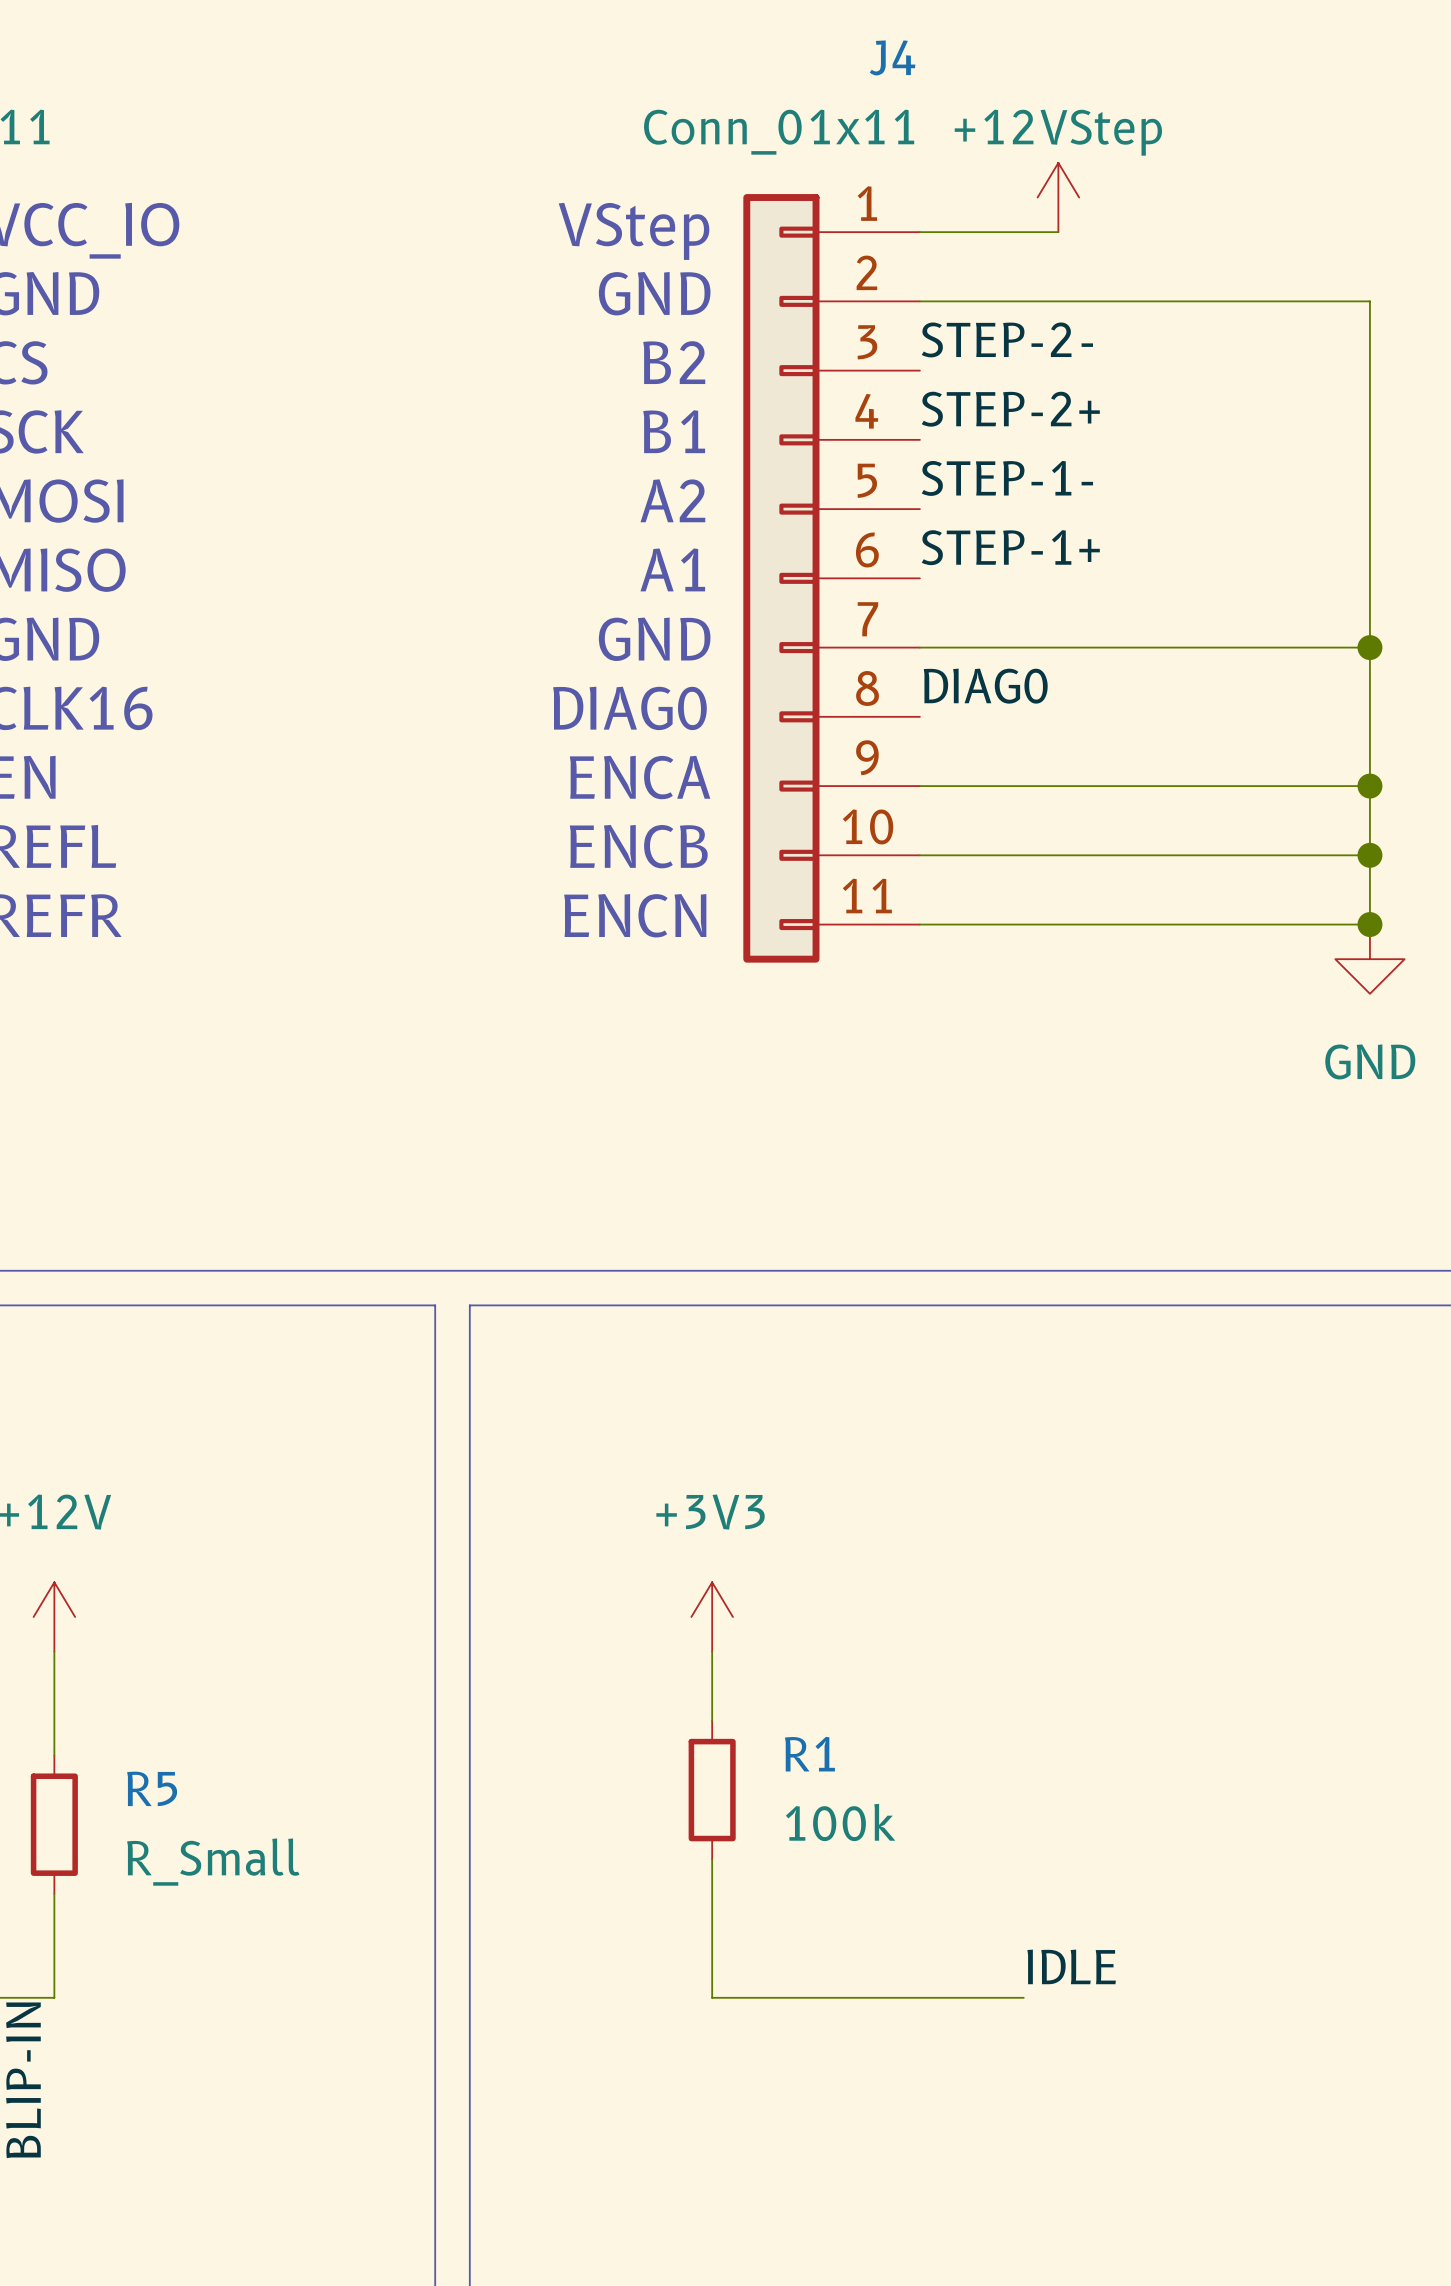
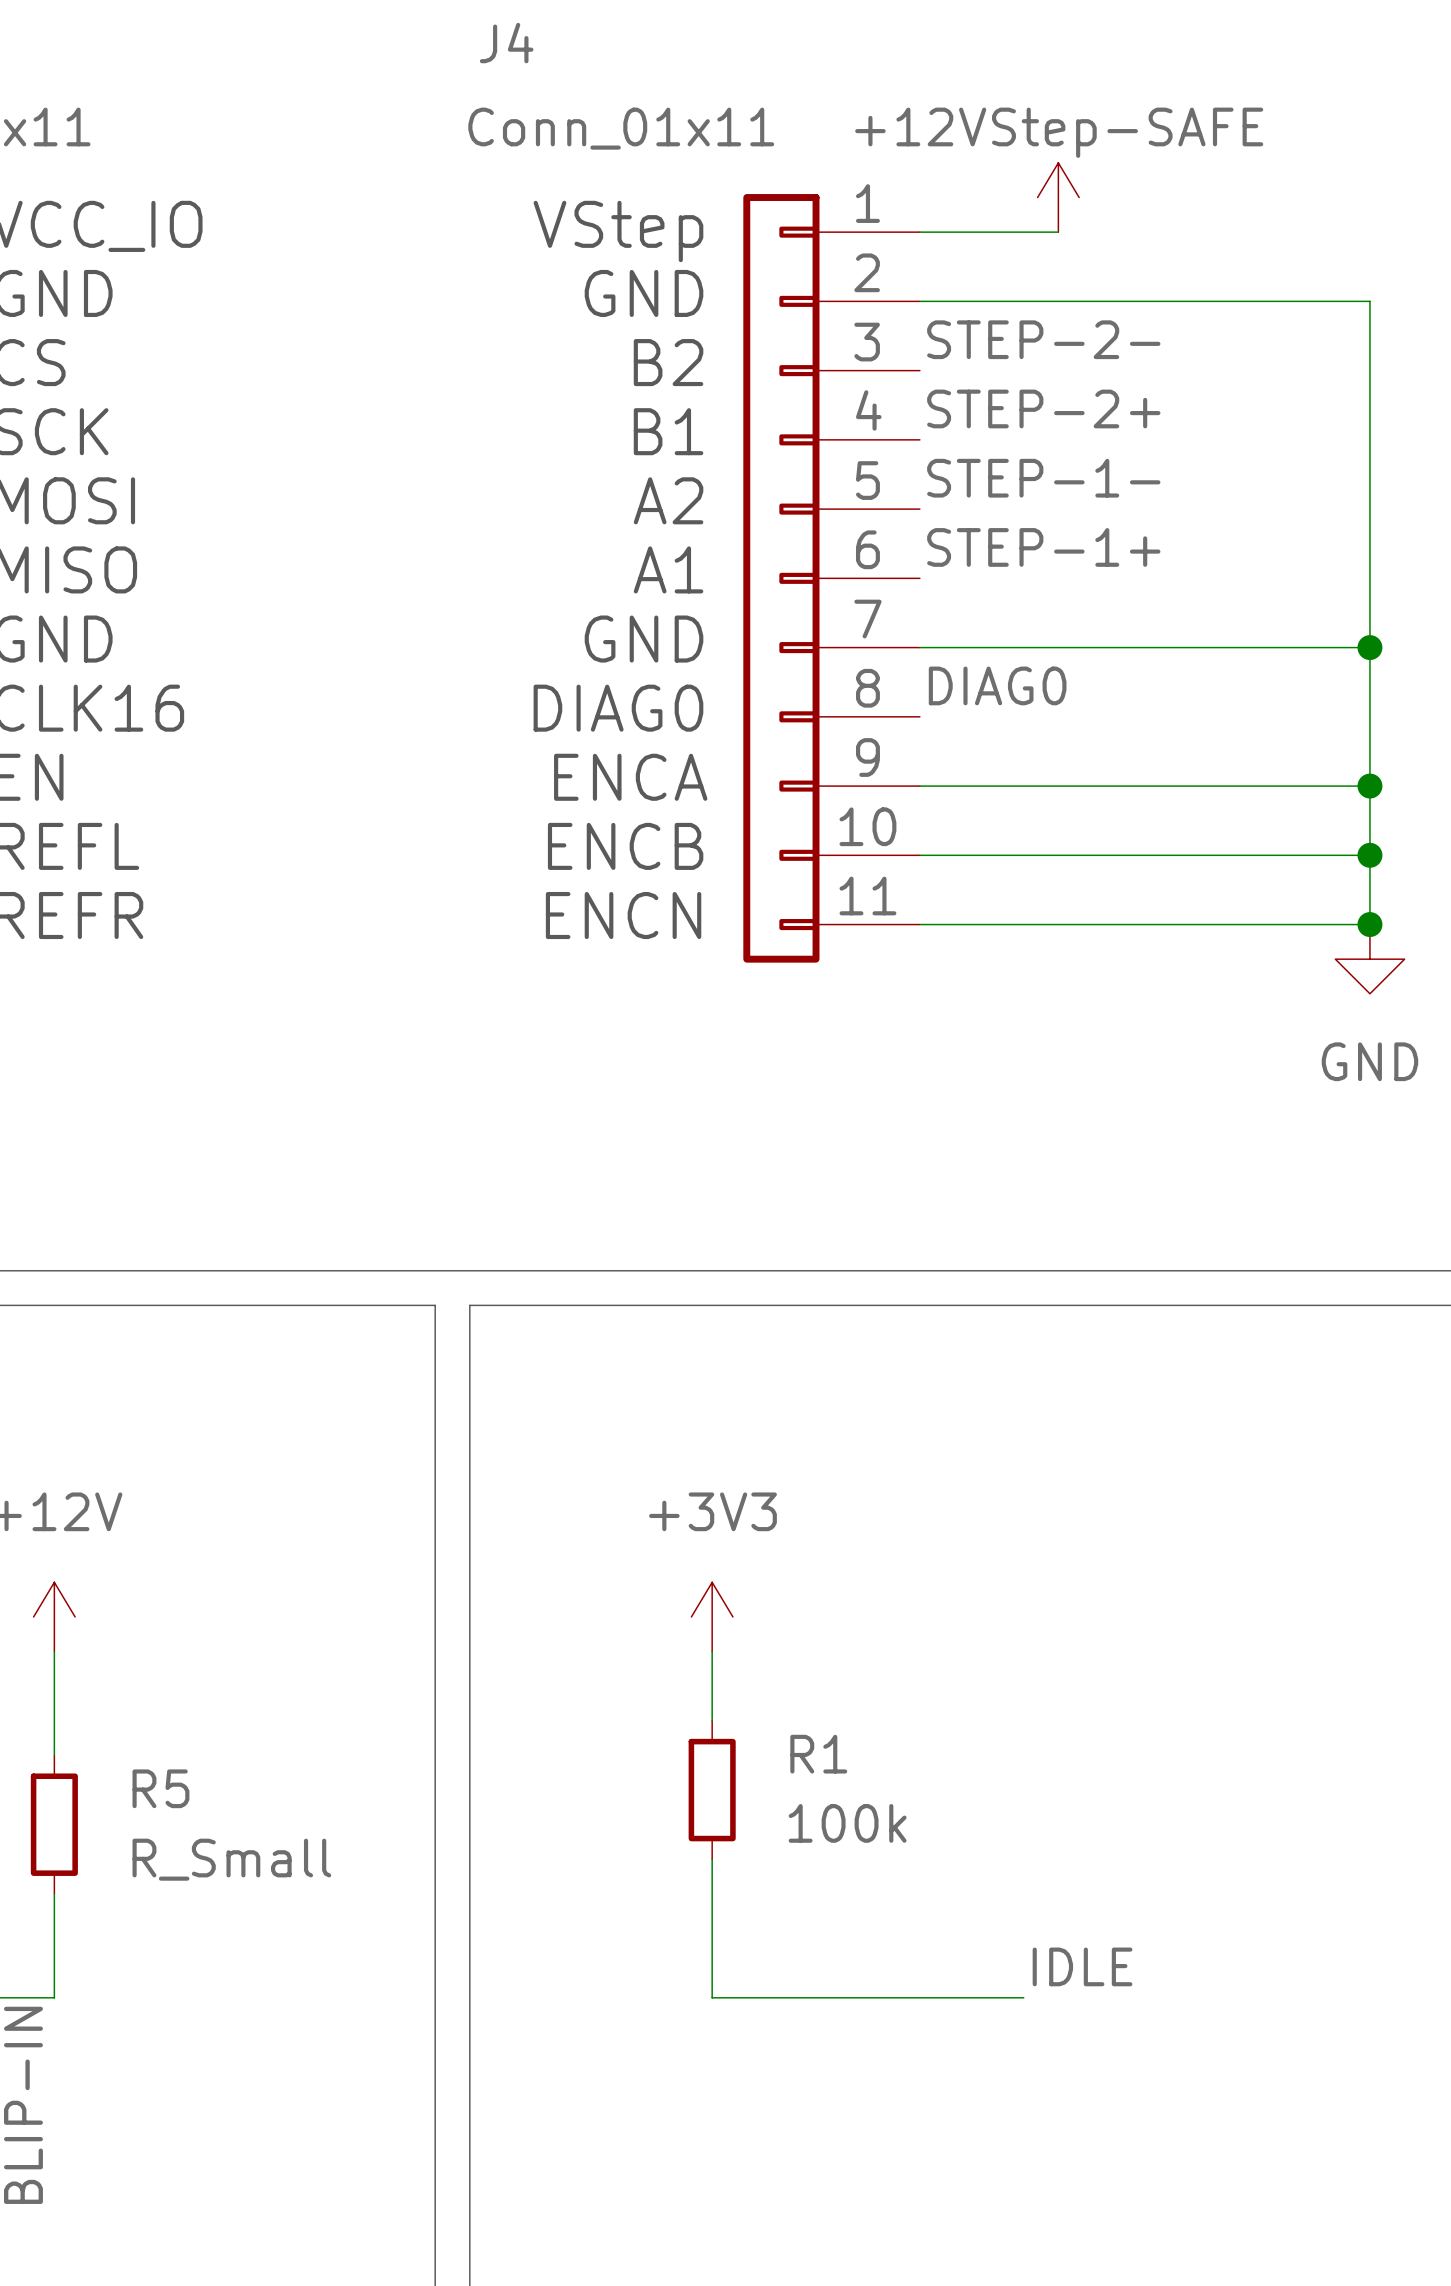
J4 name position: J4 (892, 57) -> J4 (506, 43)
J4 value position: Conn_01x11 (779, 132) -> Conn_01x11 (621, 128)
power symbol: +12VStep (1058, 197) -> +12VStep-SAFE (1058, 197)

